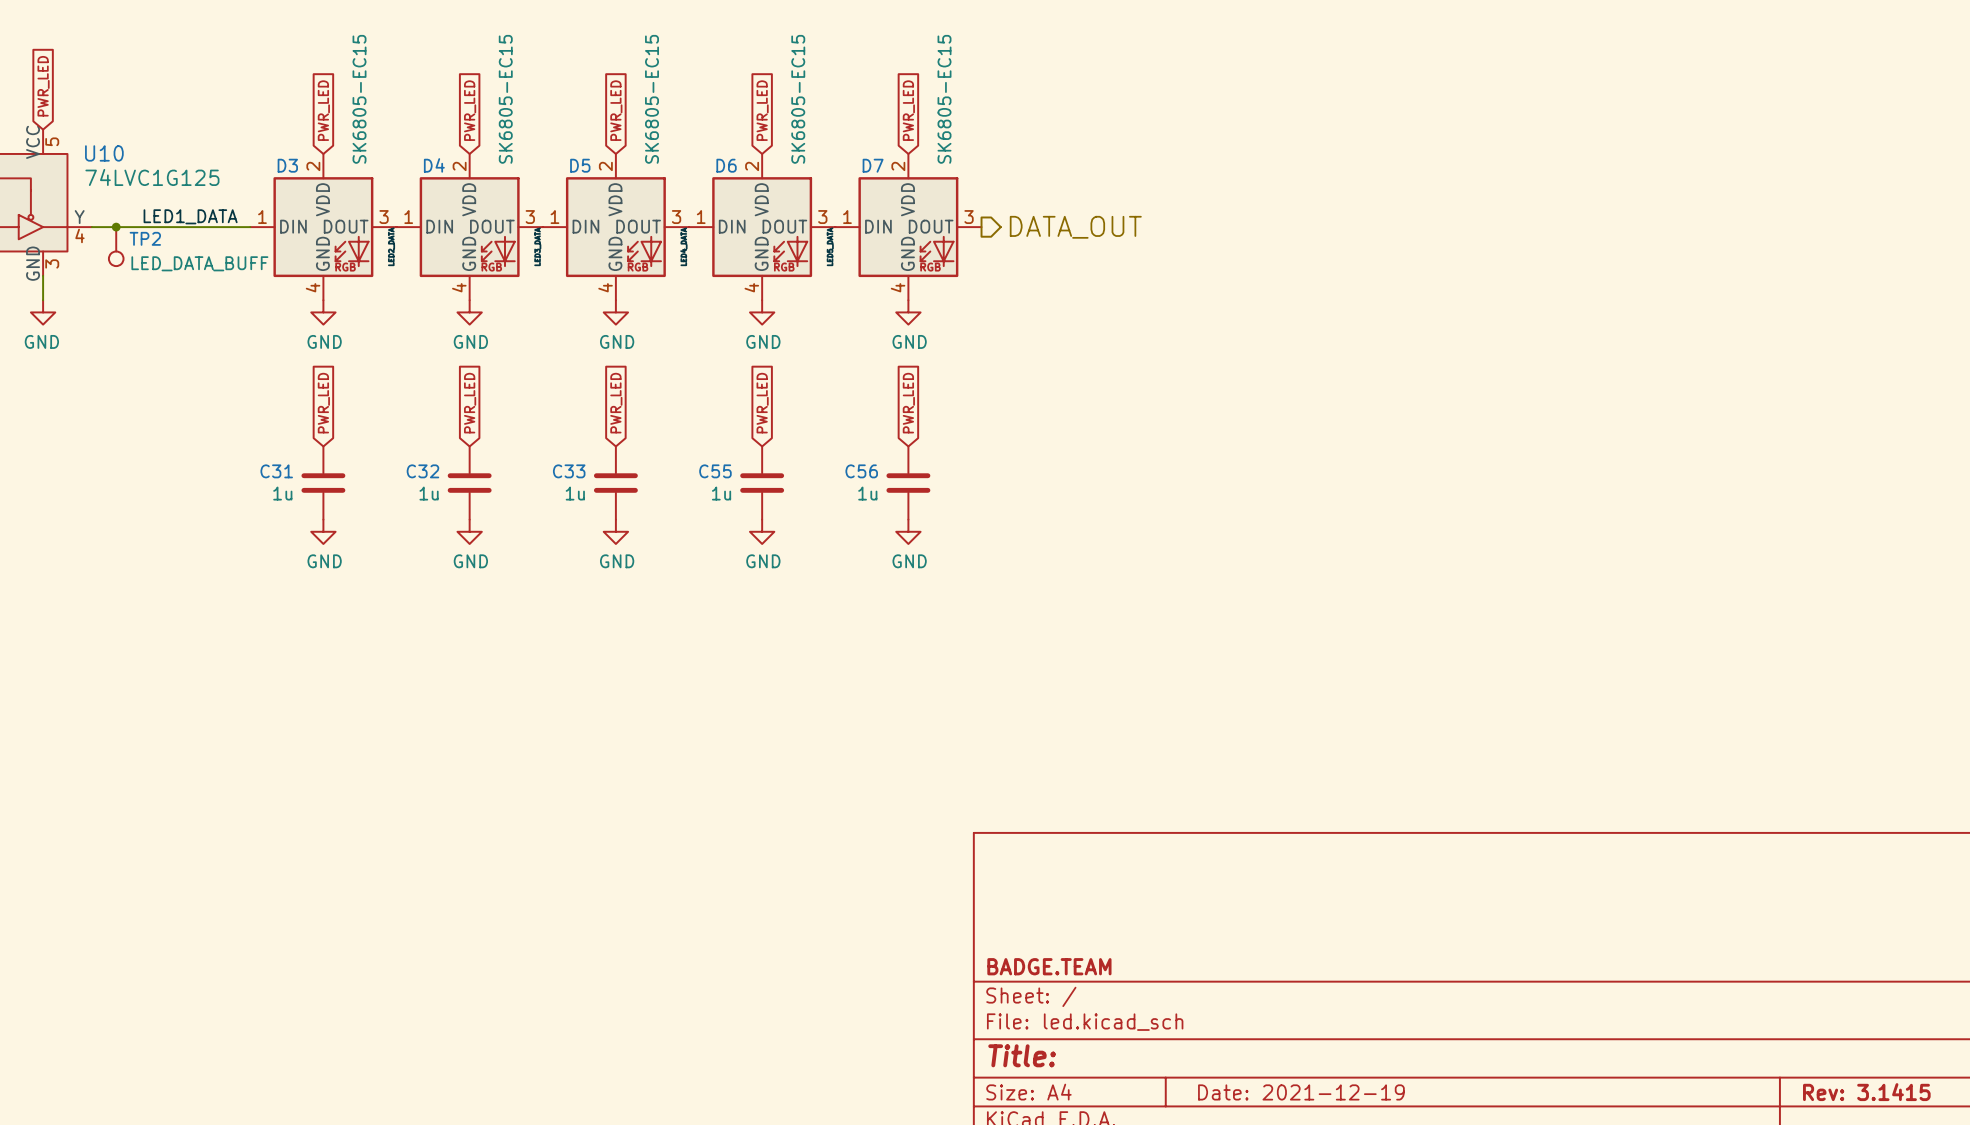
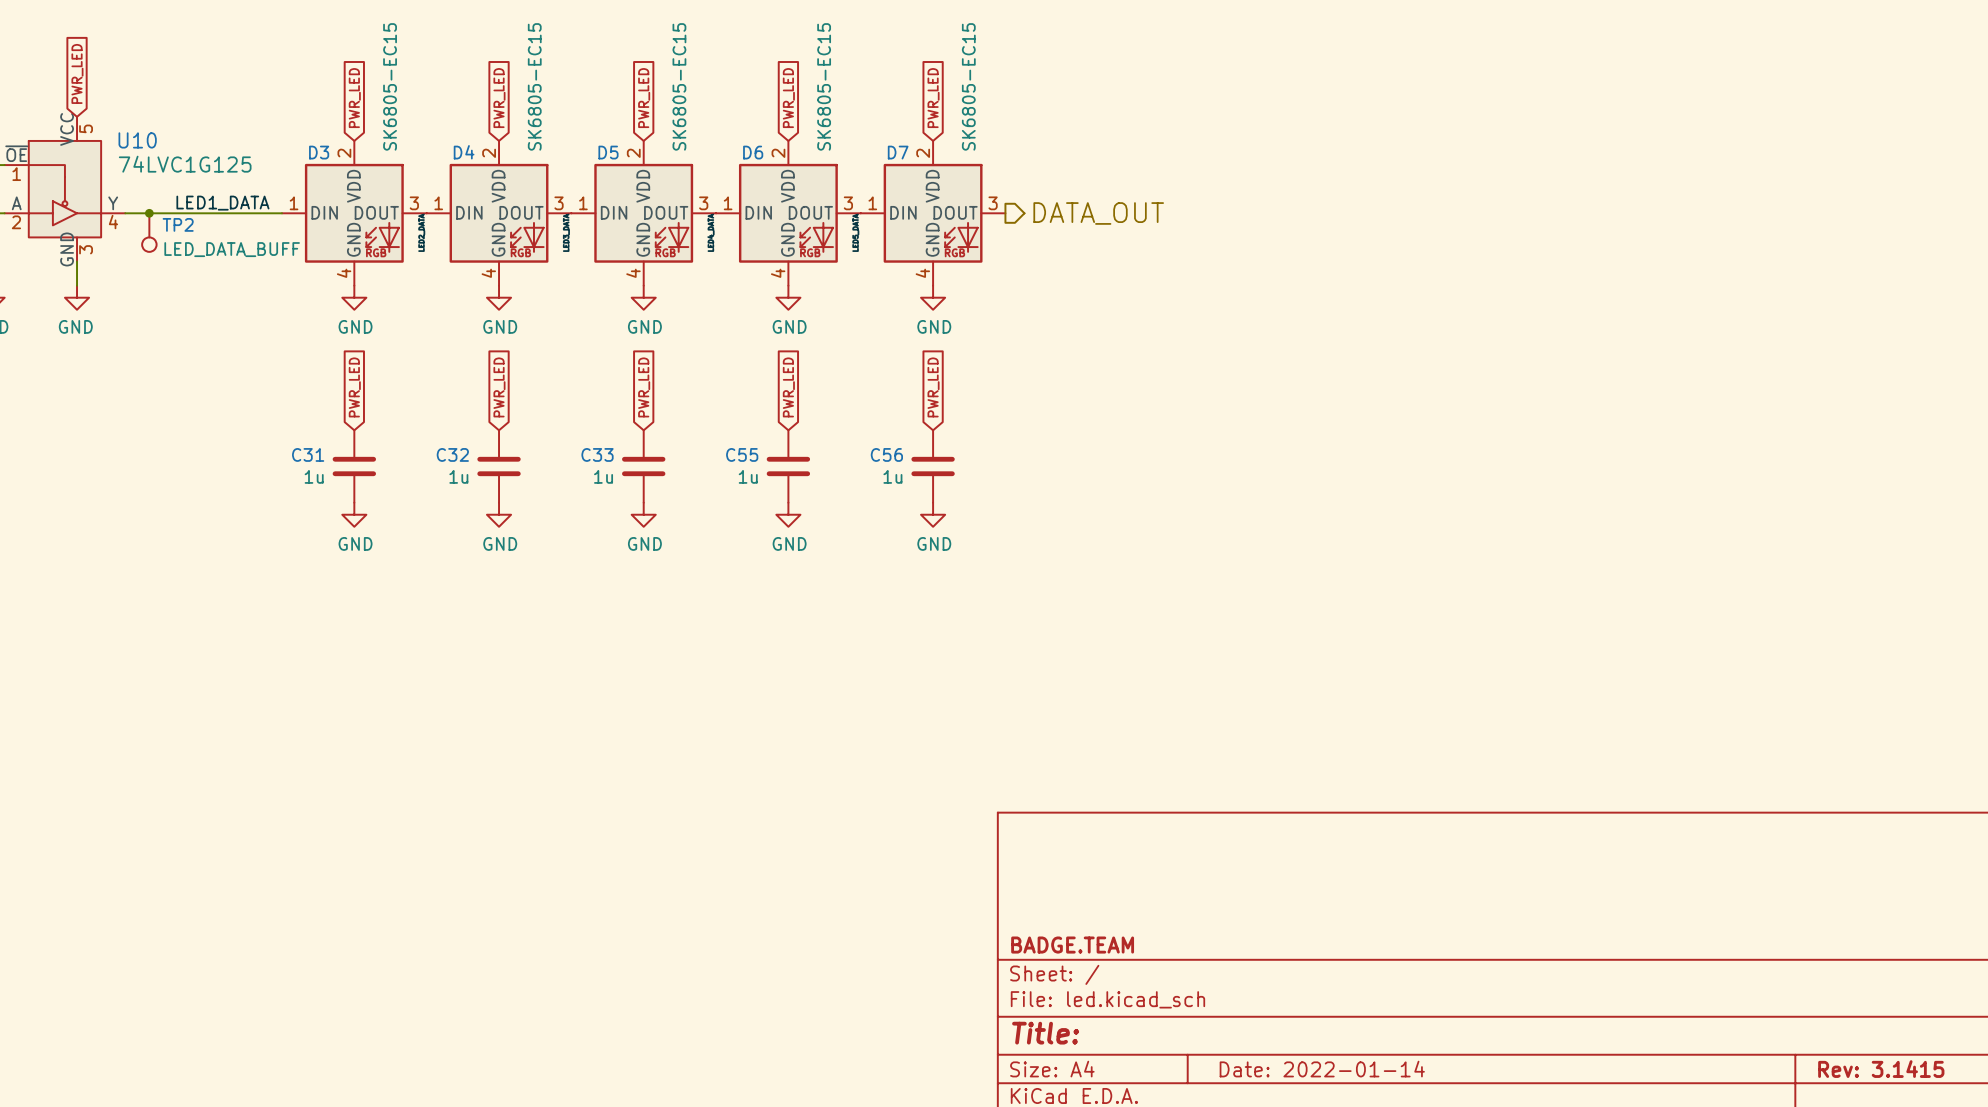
title block: Date: 2021-12-19 (1301, 1092) -> Date: 2022-01-14 (1322, 1069)

